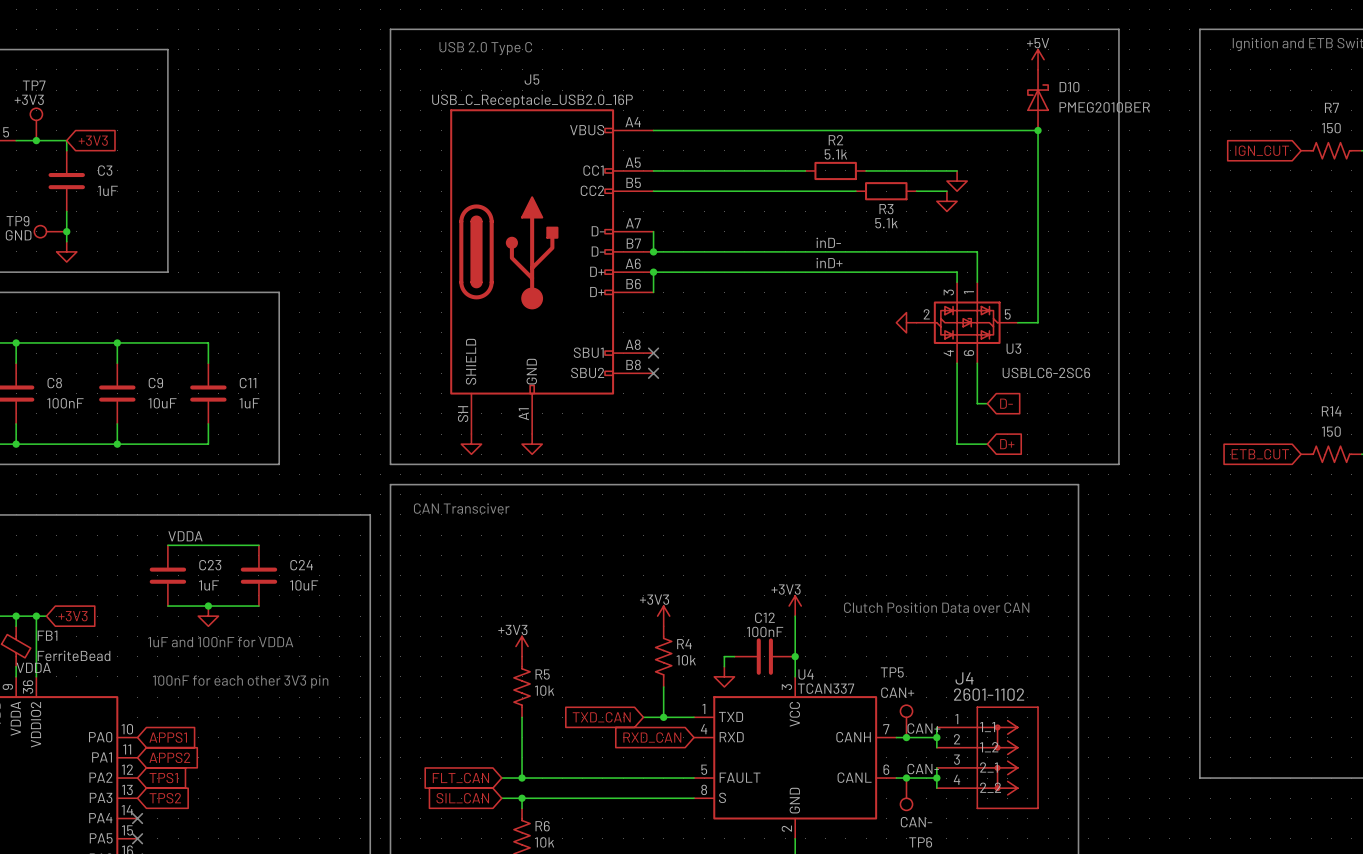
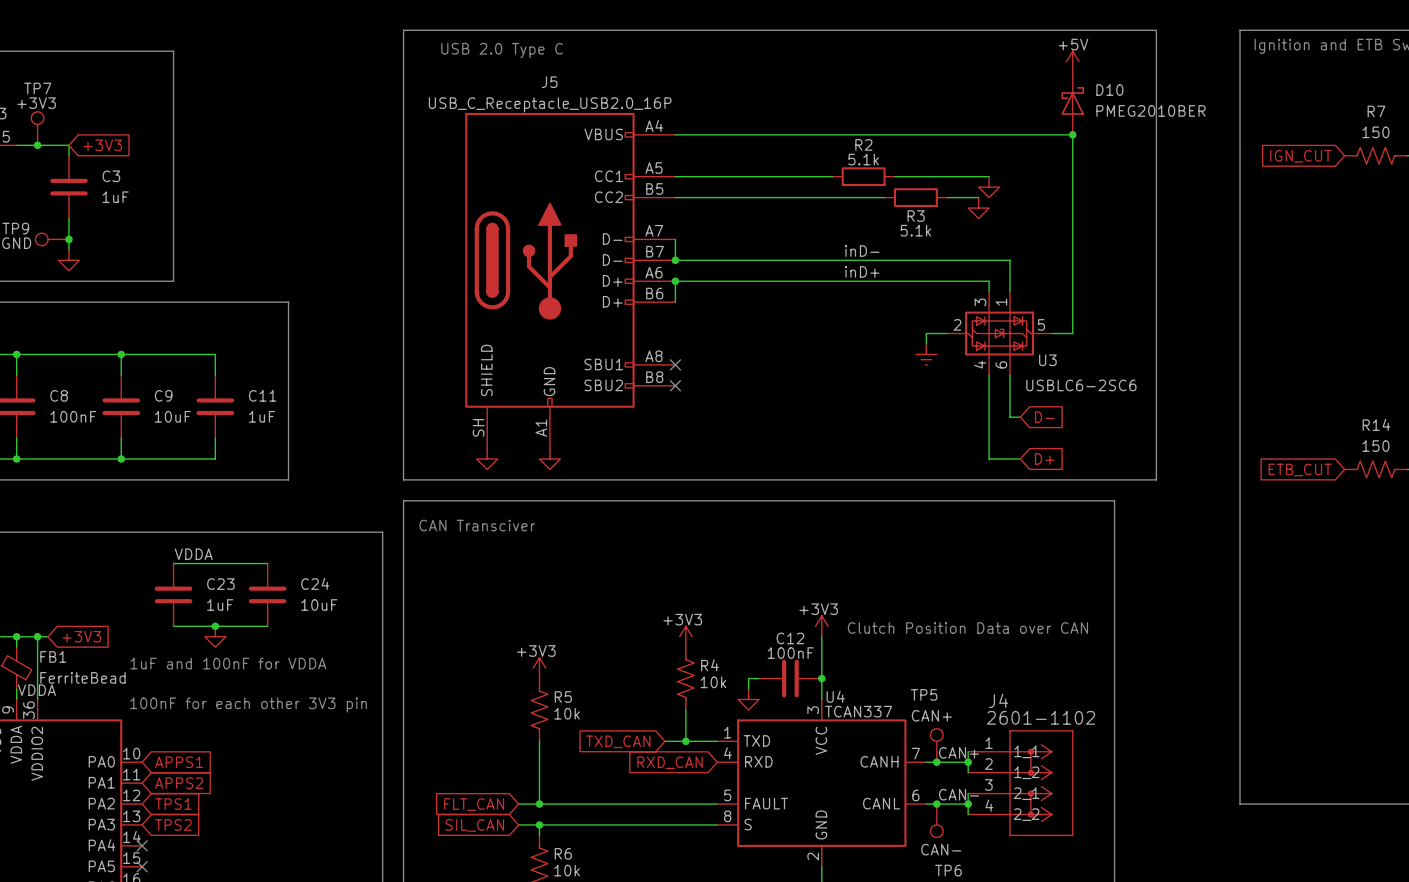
power symbol: (906, 322) -> none
wire: none -> (947, 333) (926, 333) (926, 343)
power symbol: none -> (926, 354)

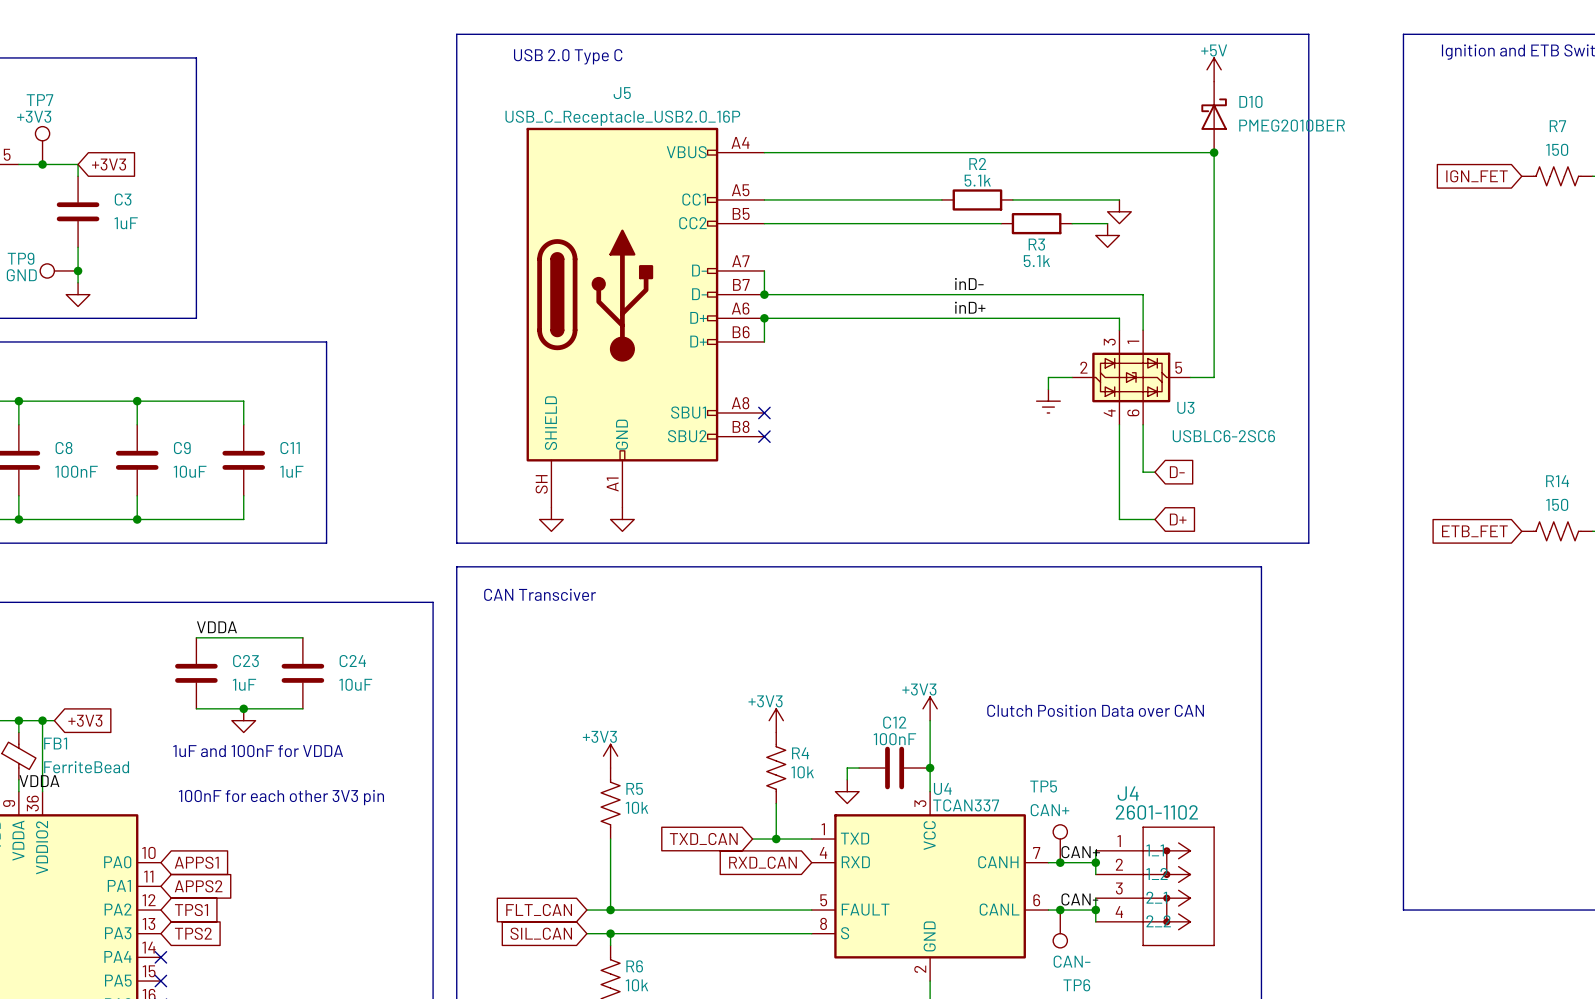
global label: IGN_CUT (1300, 156) -> IGN_FET (1477, 176)
global label: ETB_CUT (1300, 469) -> ETB_FET (1474, 531)

